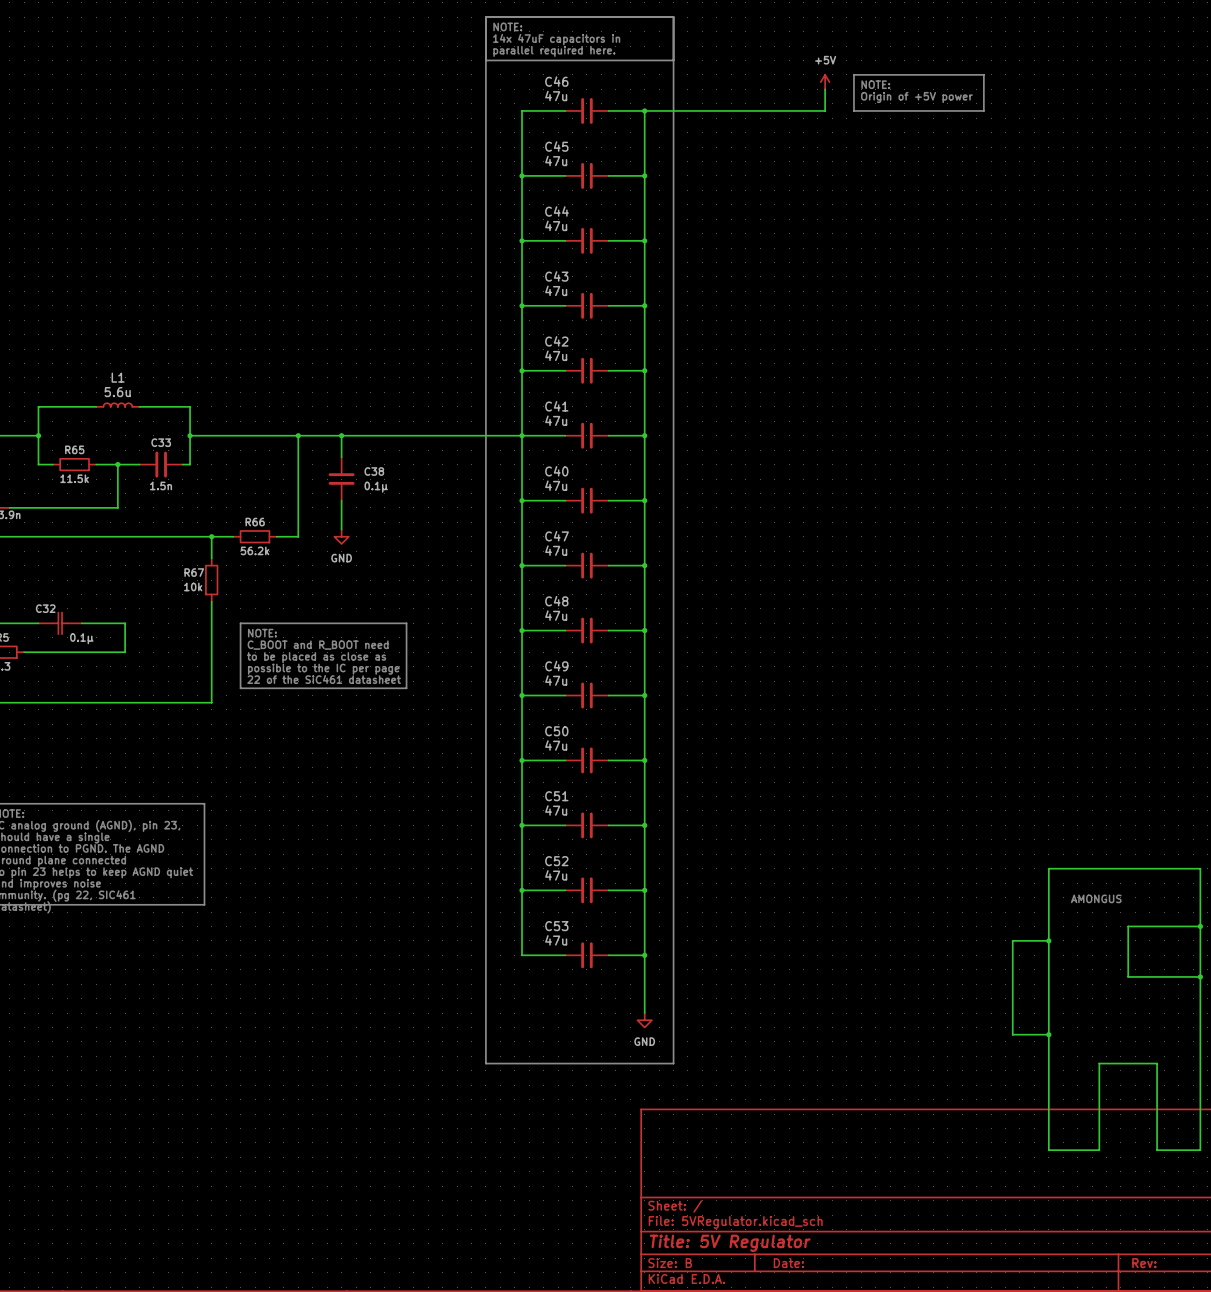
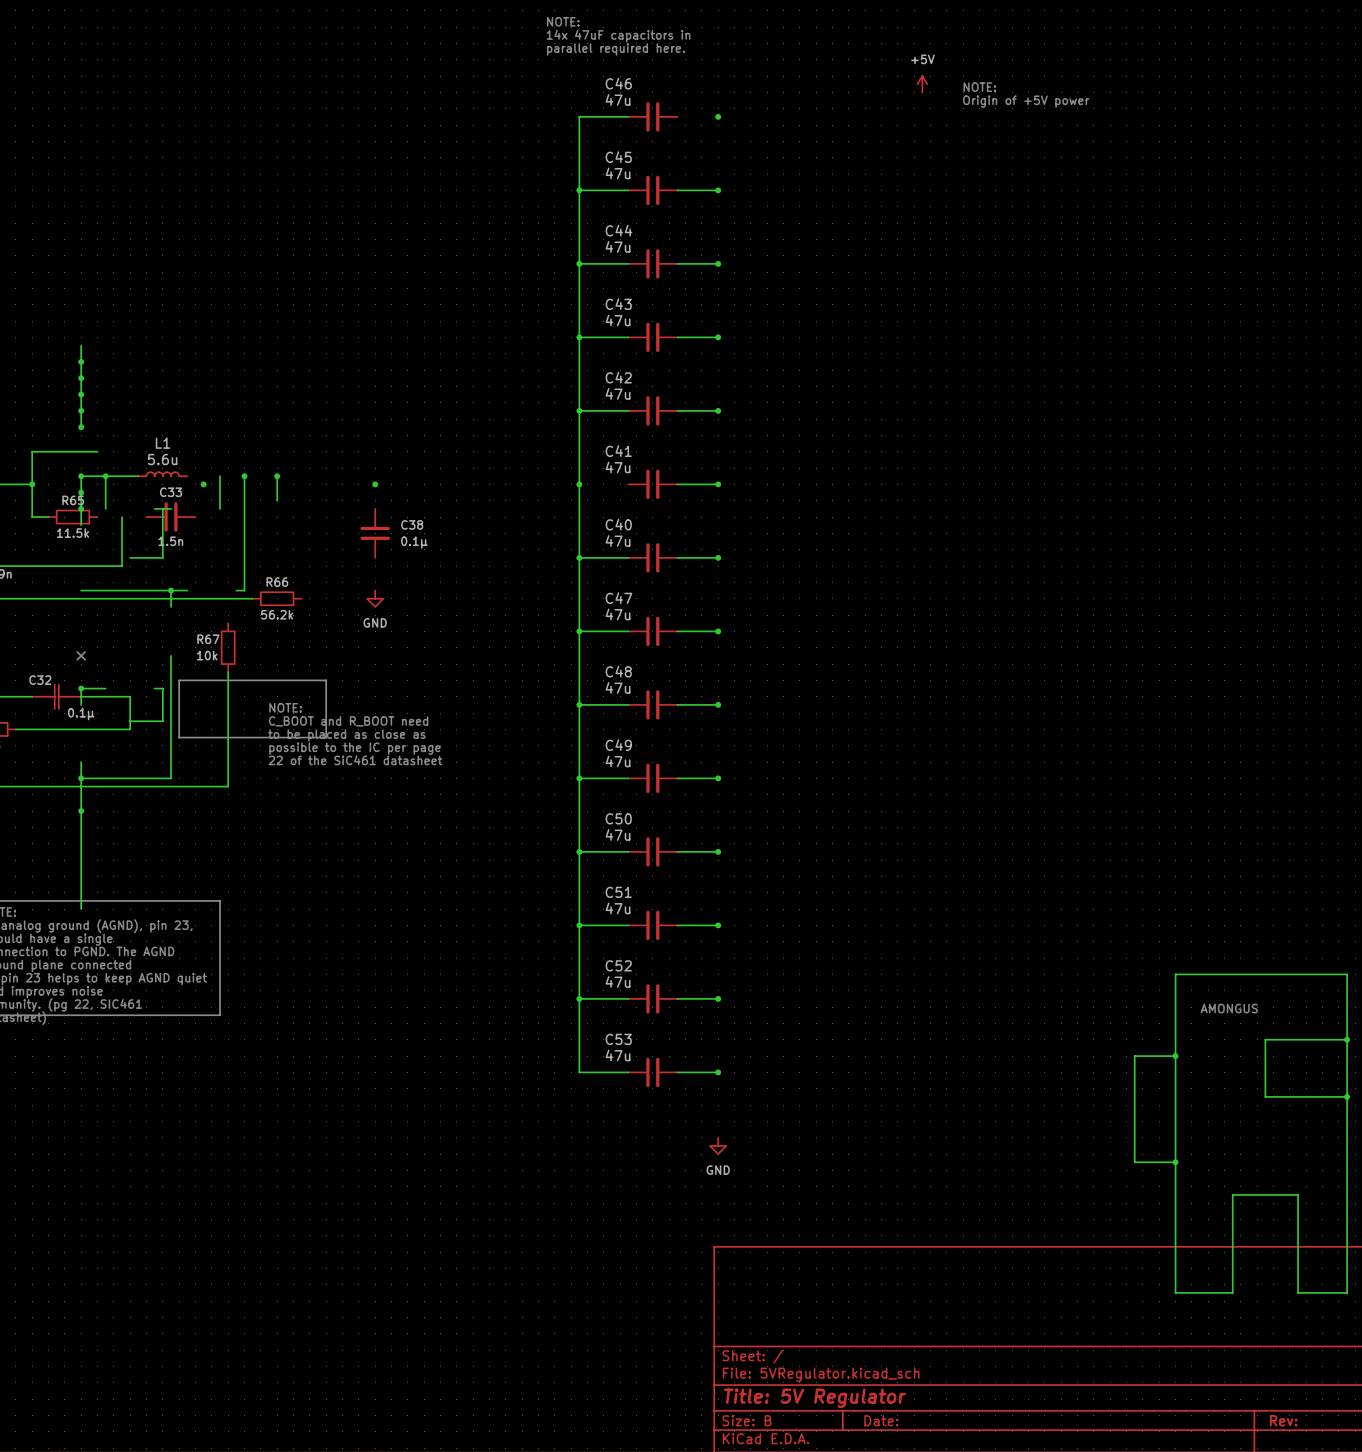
line: (485, 17) (673, 17) (673, 1063) (485, 1063) (485, 17) -> none
line: (485, 60) (673, 60) -> none
line: (853, 74) (983, 74) (983, 110) (853, 110) (853, 74) -> none
wire: (825, 89) (825, 110) (608, 110) -> none
wire: (644, 110) (644, 1013) -> none
wire: none -> (81, 345) (81, 427)
junction: none -> (81, 361)
junction: none -> (81, 378)
junction: none -> (81, 394)
junction: none -> (81, 410)
junction: none -> (81, 427)
L1 position: (117, 405) -> (162, 474)
wire: (139, 406) (190, 406) (190, 464) (182, 464) -> none
junction: none -> (81, 476)
wire: none -> (105, 476) (105, 508)
junction: none -> (105, 476)
wire: none -> (138, 476) (81, 476) (81, 525)
wire: none -> (220, 476) (220, 508)
wire: none -> (244, 476) (244, 590) (236, 590)
junction: none -> (244, 476)
junction: none -> (277, 476)
wire: (190, 435) (565, 435) -> none
wire: (298, 435) (298, 536) (276, 536) -> none
junction: (298, 435) -> none
wire: (341, 435) (341, 457) -> (277, 476) (277, 500)
junction: none -> (81, 492)
junction: none -> (81, 508)
wire: none -> (154, 508) (171, 508)
wire: none -> (162, 508) (162, 557) (130, 557)
wire: (96, 464) (139, 464) -> none
junction: (117, 464) -> none
wire: (341, 500) (341, 529) -> none
wire: none -> (81, 590) (187, 590)
wire: none -> (171, 590) (171, 606)
junction: none -> (171, 590)
wire: (211, 536) (211, 558) -> none
junction: (211, 536) -> none
no-connect mark: none -> (81, 655)
wire: none -> (171, 655) (171, 778) (81, 778)
line: none -> (179, 680) (326, 680) (326, 737) (179, 737) (179, 680)
junction: none -> (81, 688)
wire: none -> (105, 688) (81, 688) (81, 704)
wire: none -> (154, 688) (162, 688) (162, 721) (130, 721)
line: (240, 623) (406, 623) (406, 688) (240, 688) (240, 623) -> none
wire: none -> (81, 762) (81, 909)
junction: none -> (81, 778)
junction: none -> (81, 811)

